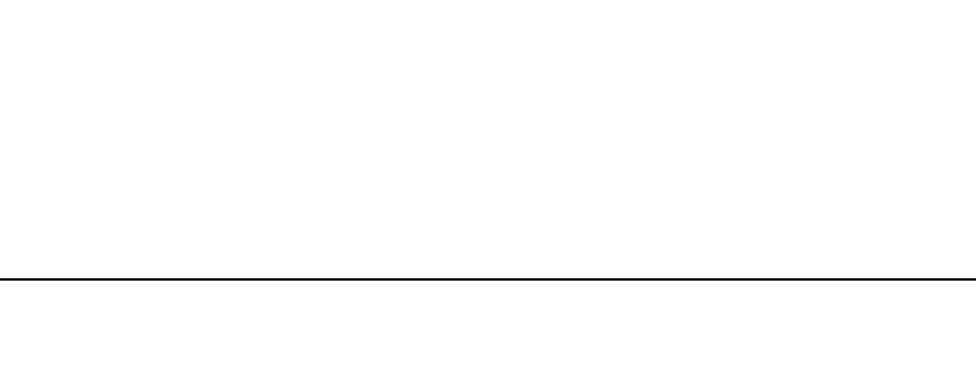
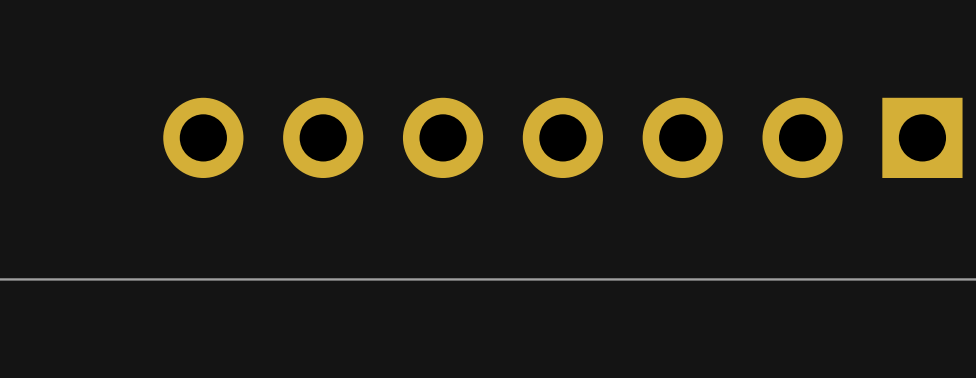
part: none -> (562, 137)

